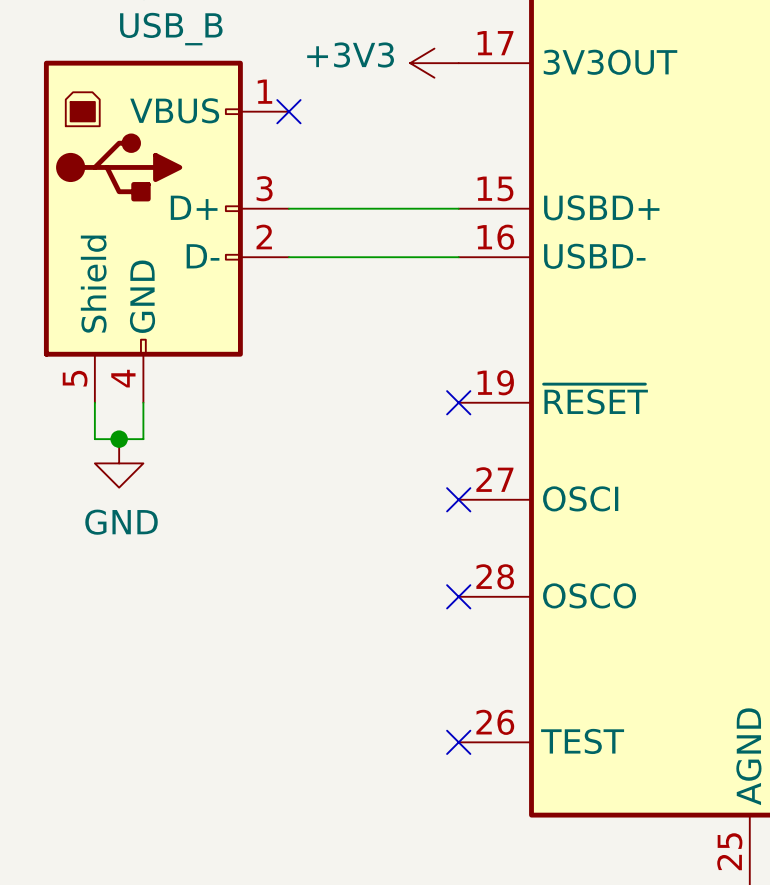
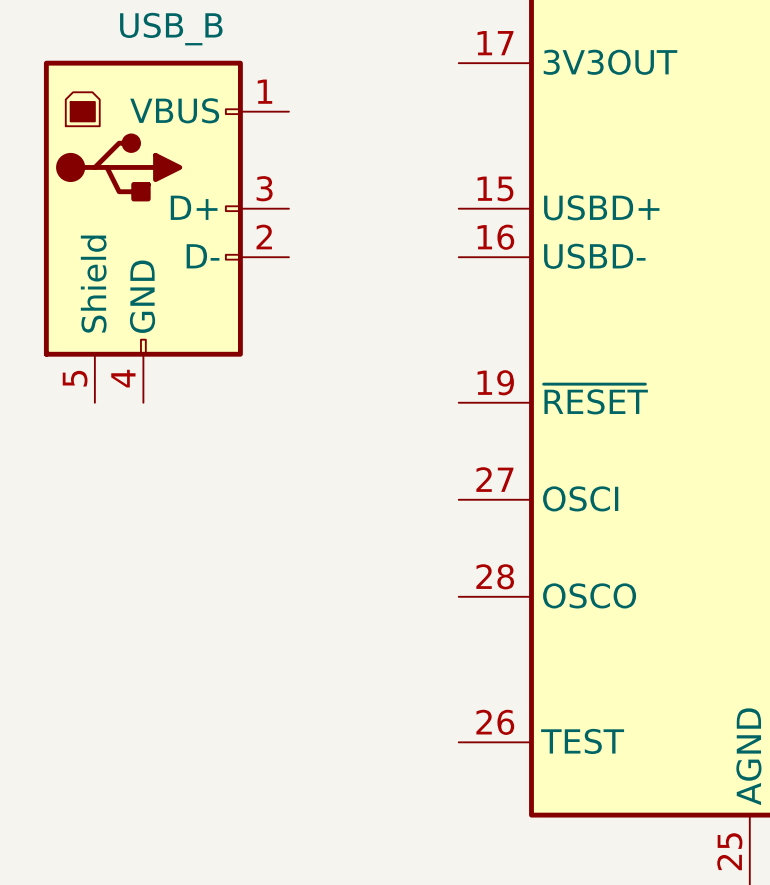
power symbol: +3V3 (434, 63) -> none
no-connect mark: (288, 111) -> none
wire: (288, 208) (458, 208) -> none
wire: (288, 257) (458, 257) -> none
wire: (94, 402) (94, 439) (143, 439) (143, 402) -> none
no-connect mark: (458, 402) -> none
junction: (119, 439) -> none
power symbol: GND (119, 463) -> none
no-connect mark: (458, 499) -> none
no-connect mark: (458, 596) -> none
no-connect mark: (458, 742) -> none

